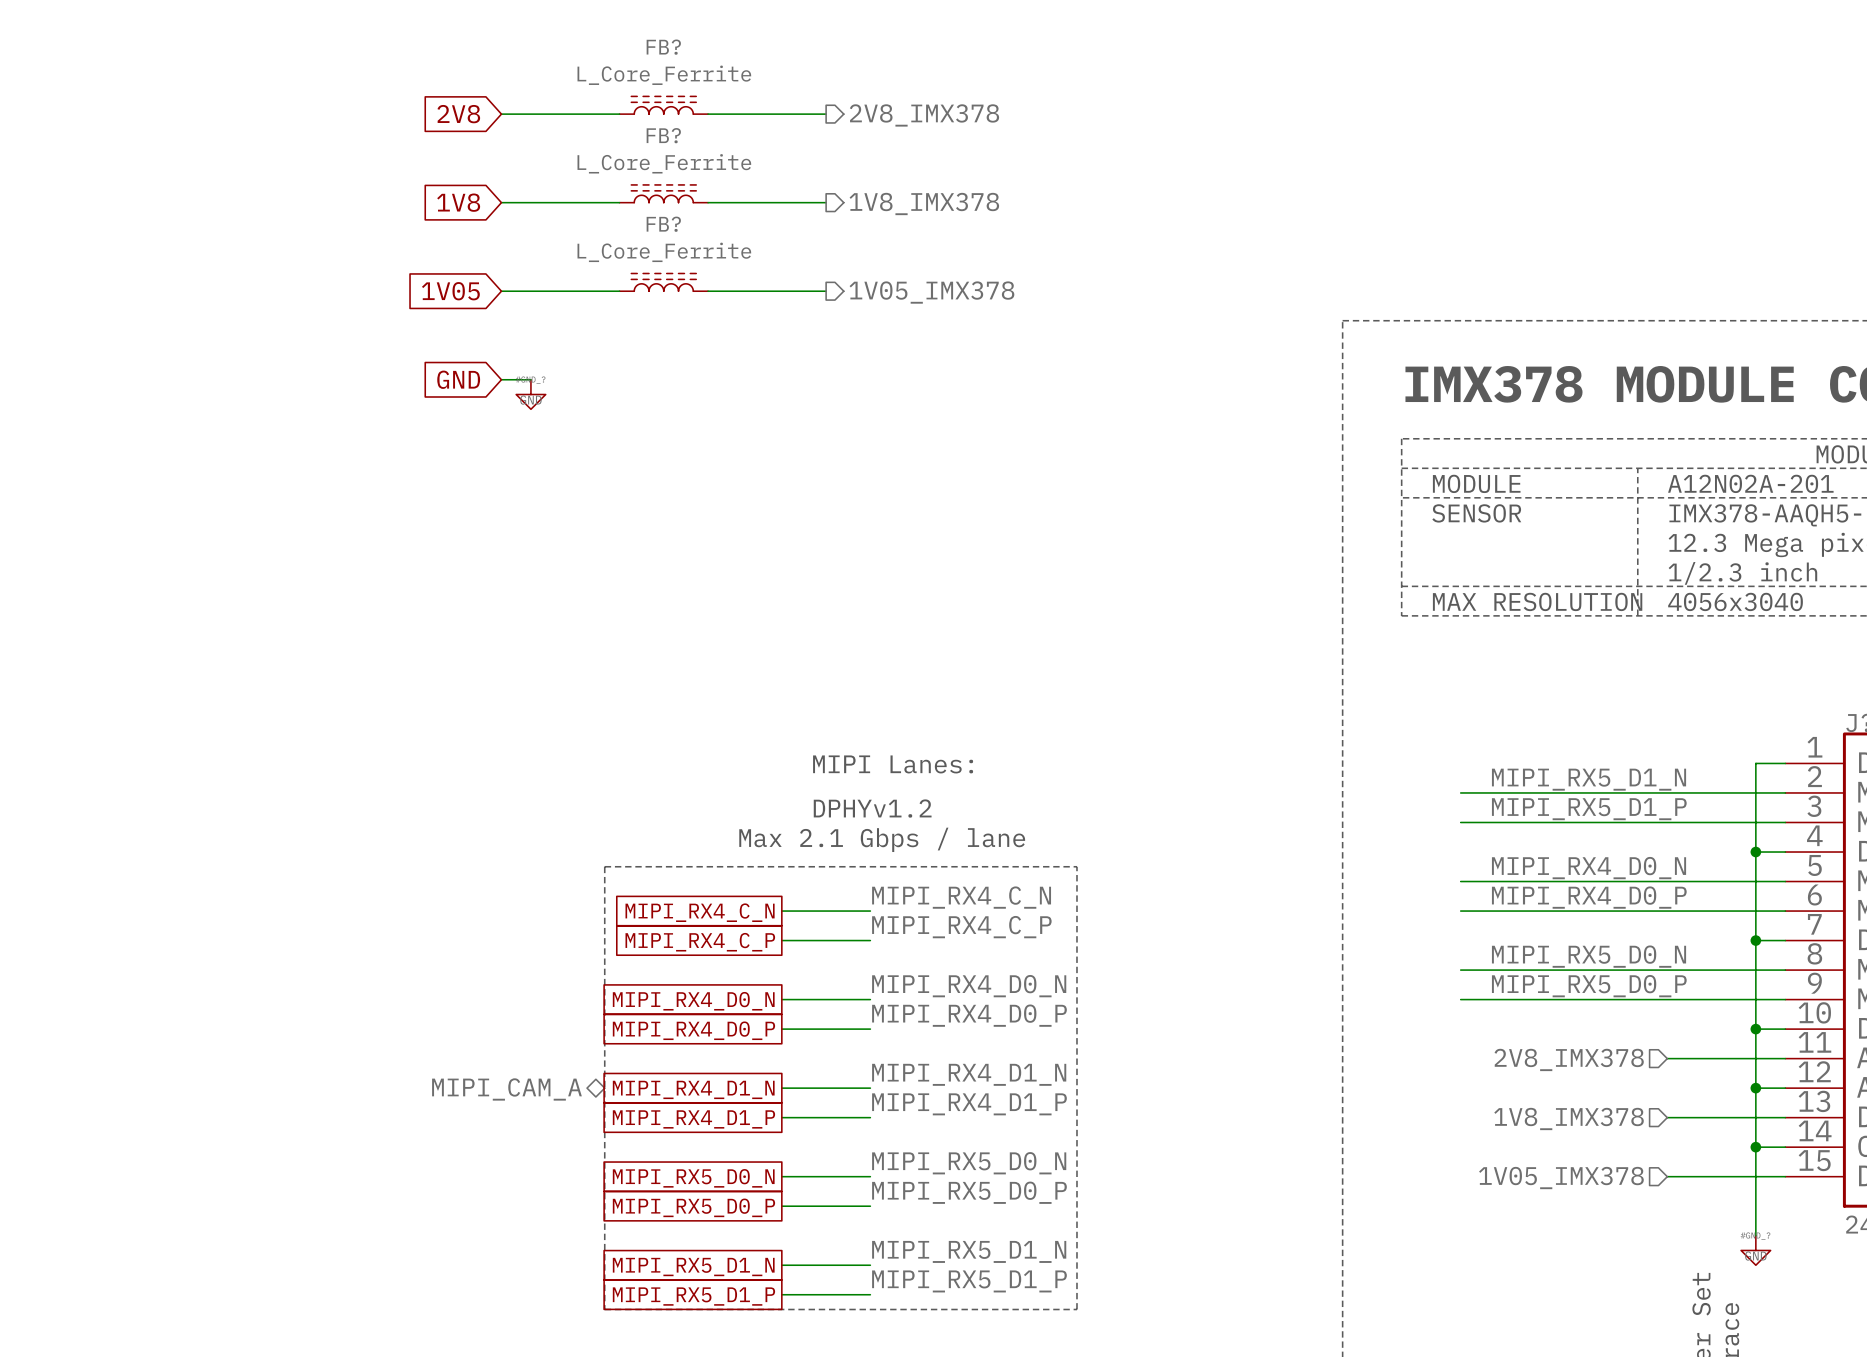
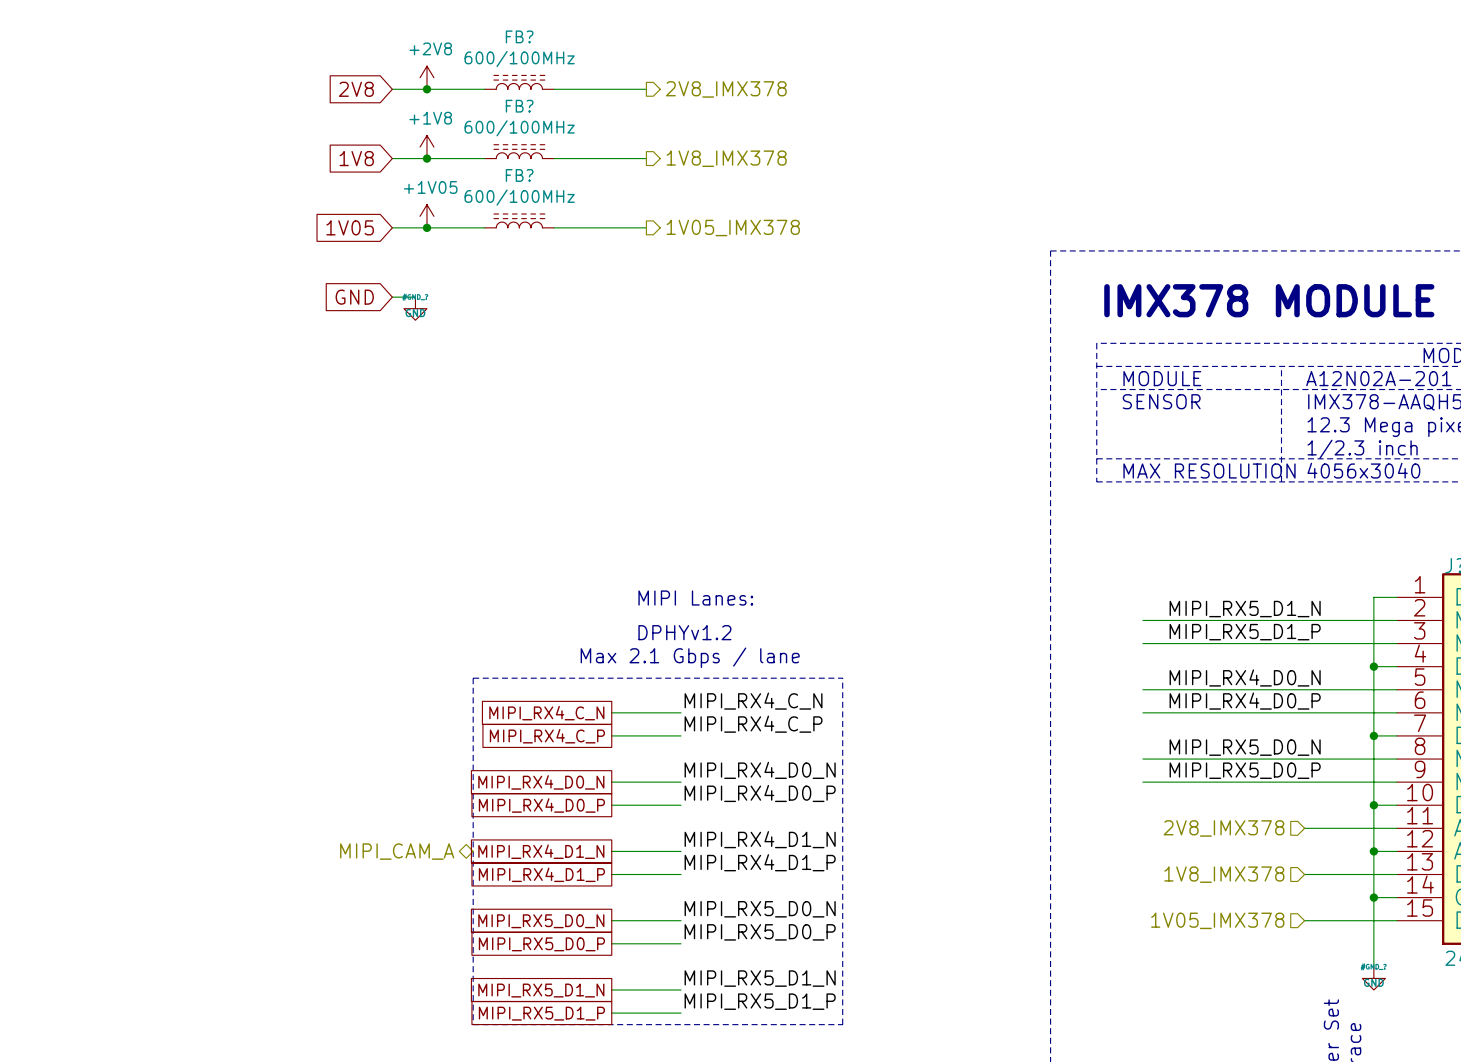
FB? value: L_Core_Ferrite (664, 75) -> 600/100MHz (519, 59)
power symbol: none -> +2V8 (426, 77)
junction: none -> (426, 89)
FB? value: L_Core_Ferrite (664, 163) -> 600/100MHz (519, 128)
power symbol: none -> +1V8 (426, 147)
junction: none -> (426, 158)
FB? value: L_Core_Ferrite (664, 252) -> 600/100MHz (519, 197)
power symbol: none -> +1V05 (426, 216)
junction: none -> (426, 227)

